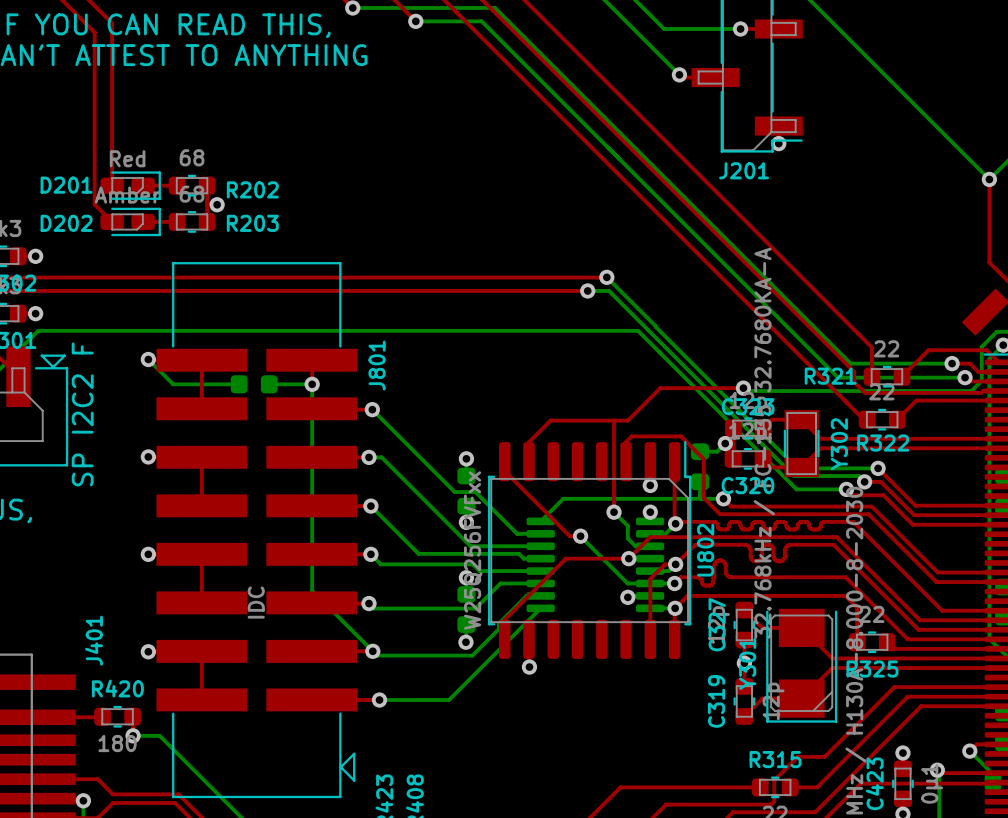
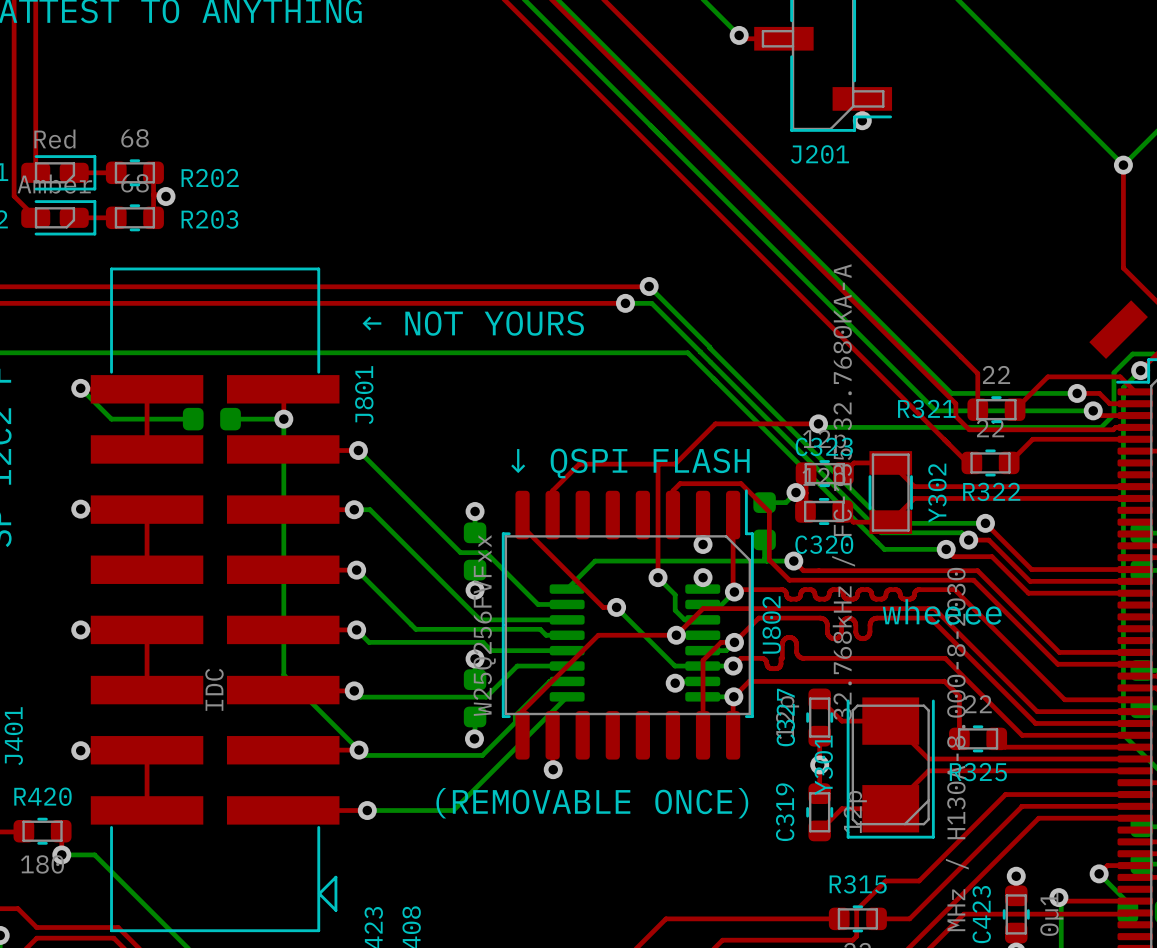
text: none -> ← NOT YOURS (473, 323)
text: none -> ↓ QSPI FLASH (630, 463)
text: none -> wheeee (942, 611)
text: none -> (REMOVABLE ONCE) (592, 803)

